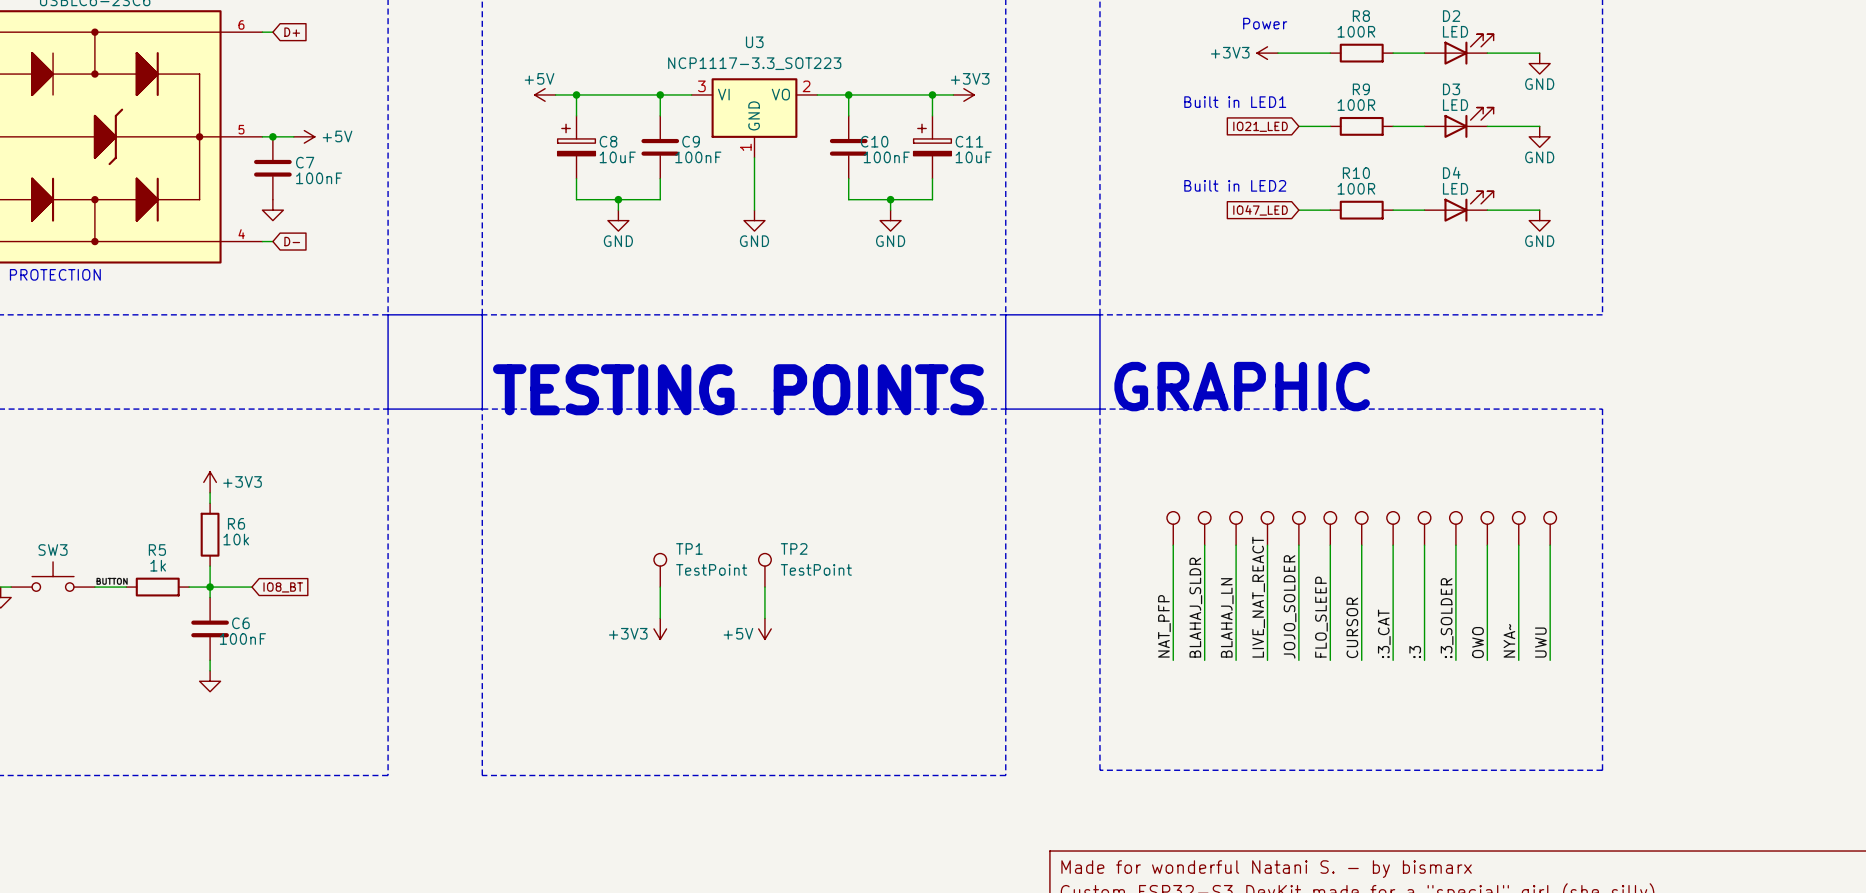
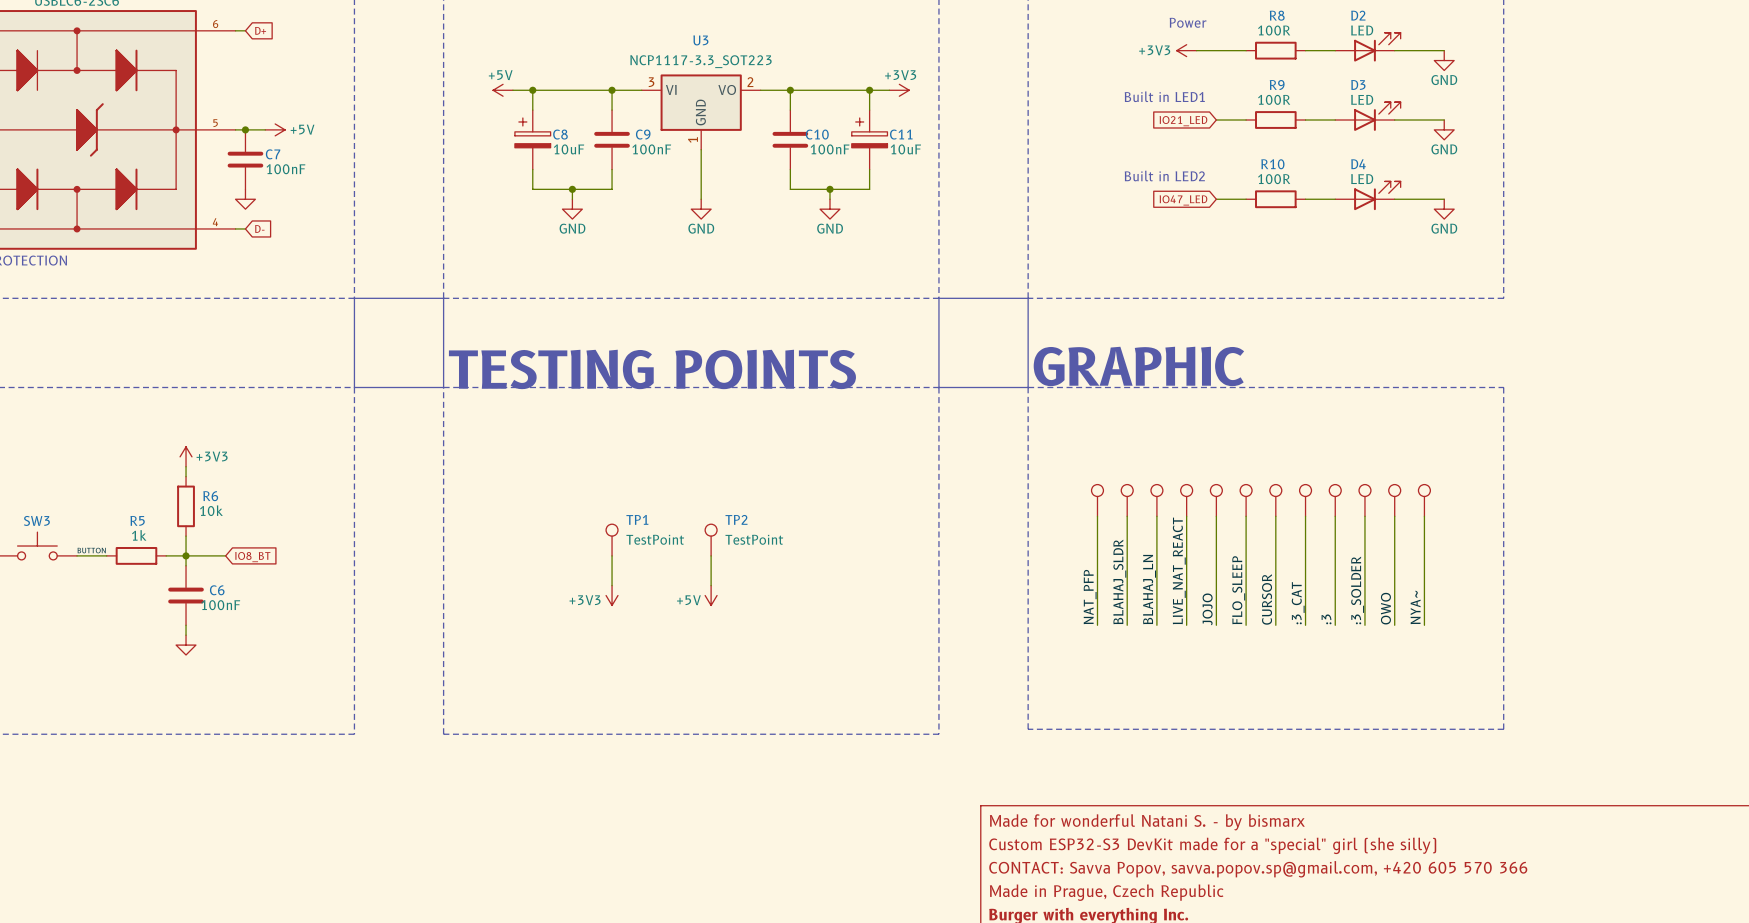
part: (1550, 528) -> none
wire: (1550, 545) (1550, 660) -> none
label: JOJO_SOLDER (1290, 606) -> JOJO (1207, 609)
label: UWU (1540, 642) -> none

